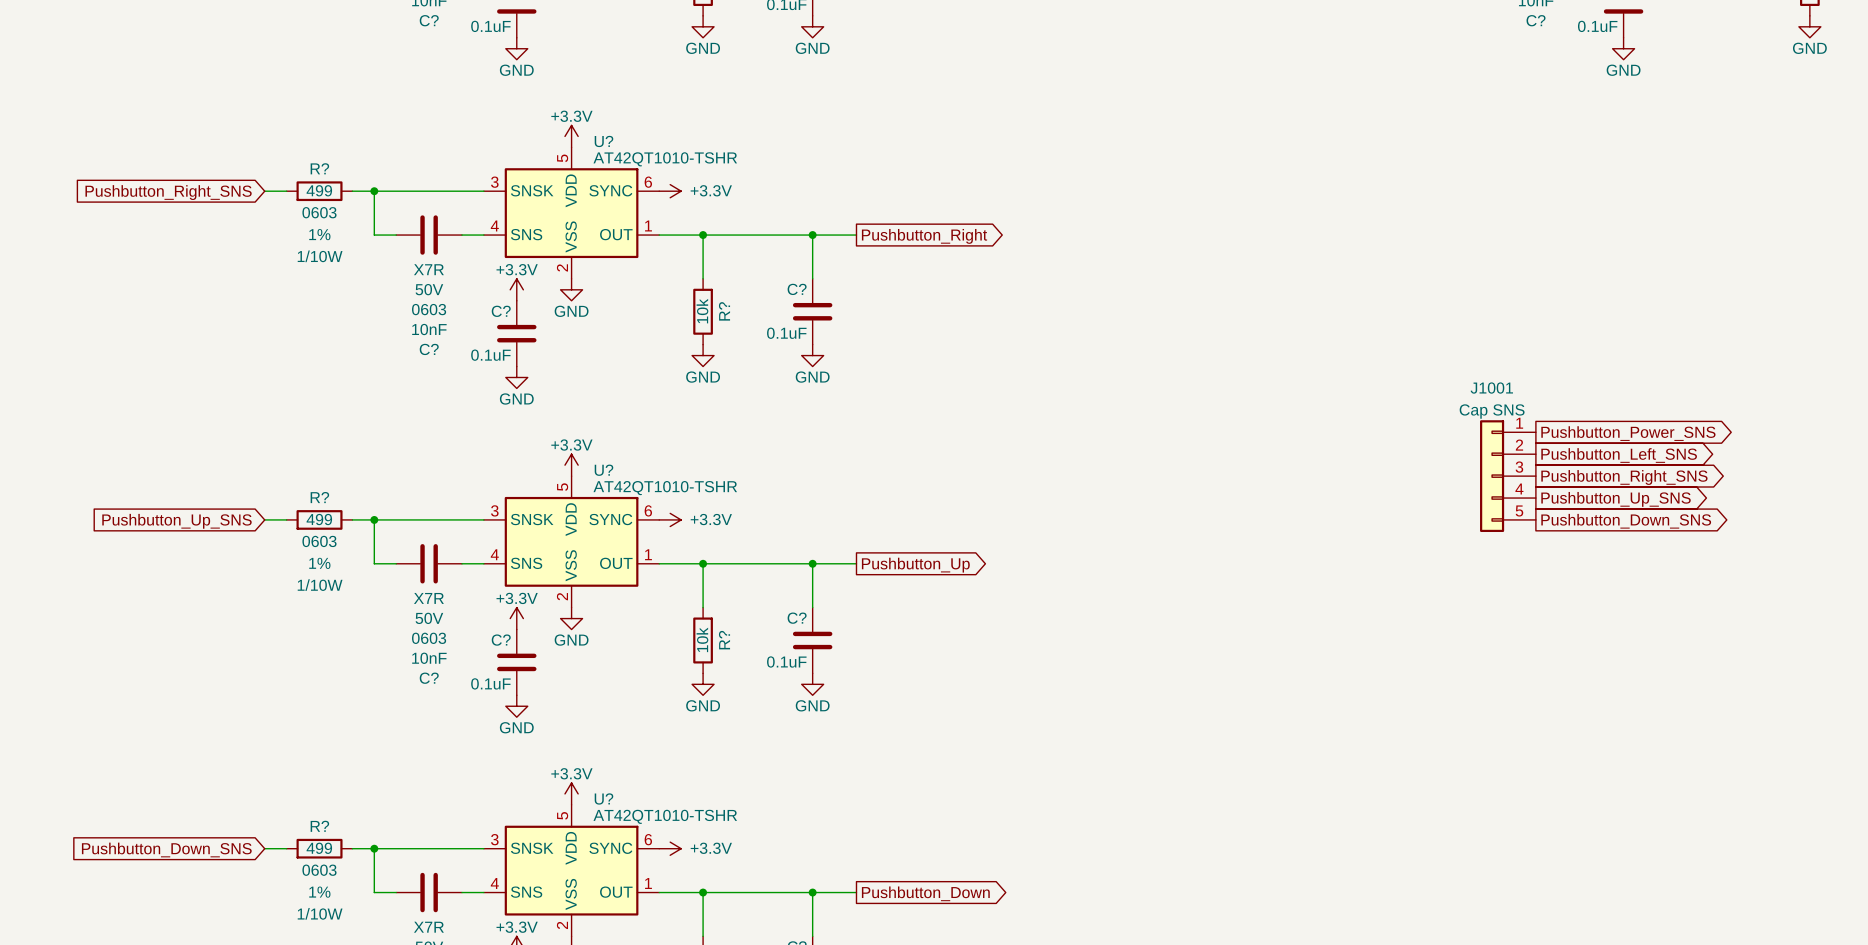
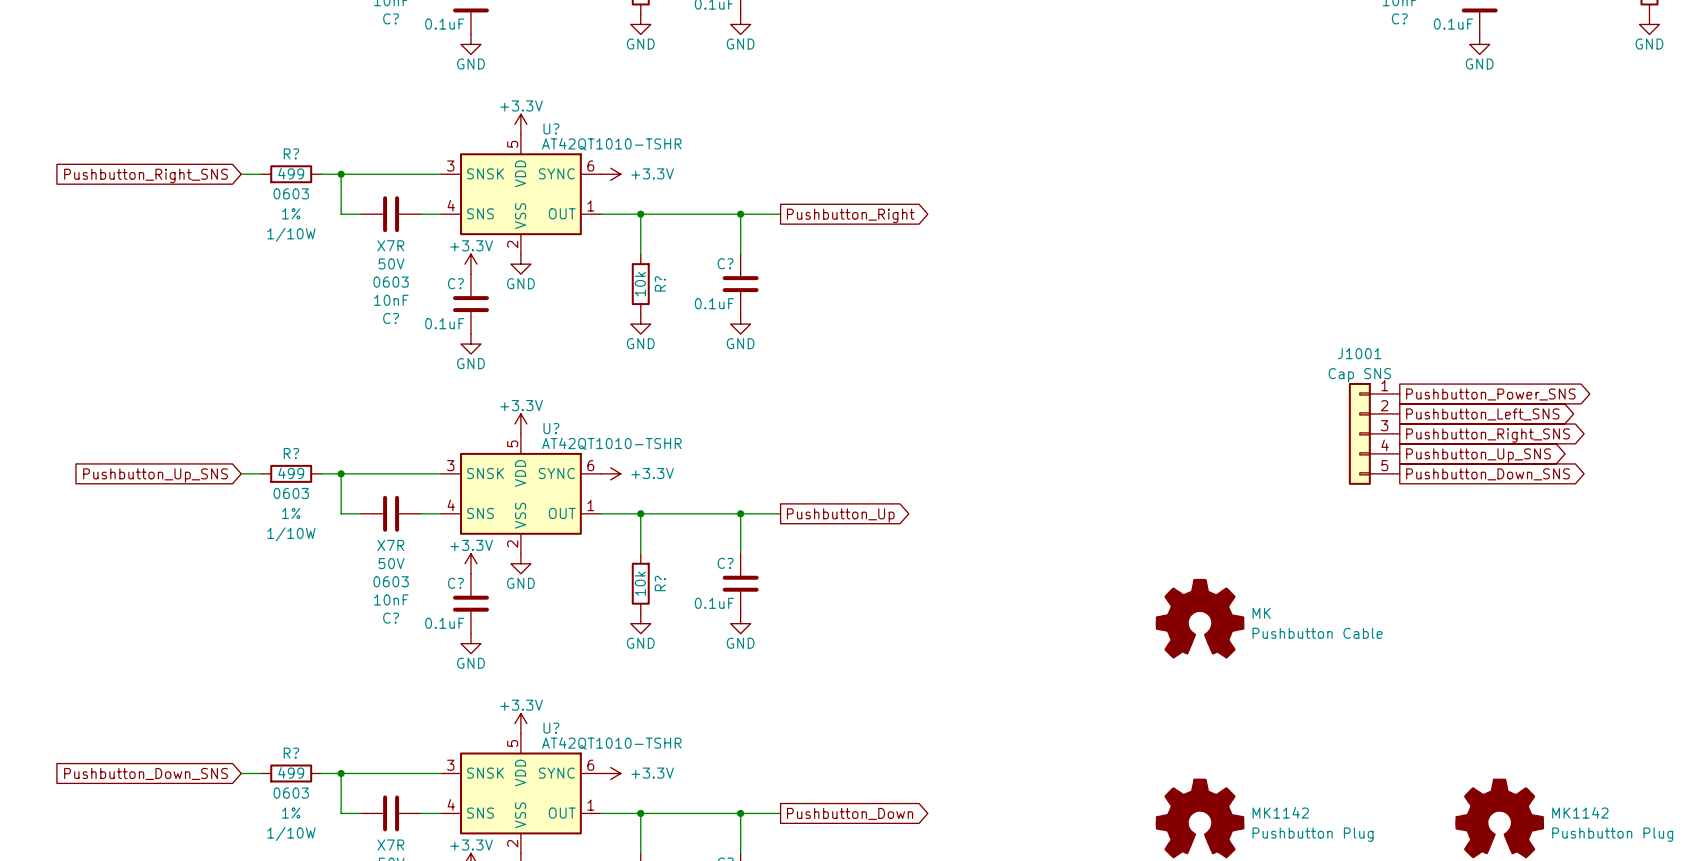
MK: none -> Pushbutton Cable (1200, 618)
MK1142: none -> Pushbutton Plug (1200, 818)
MK1142: none -> Pushbutton Plug (1499, 818)

